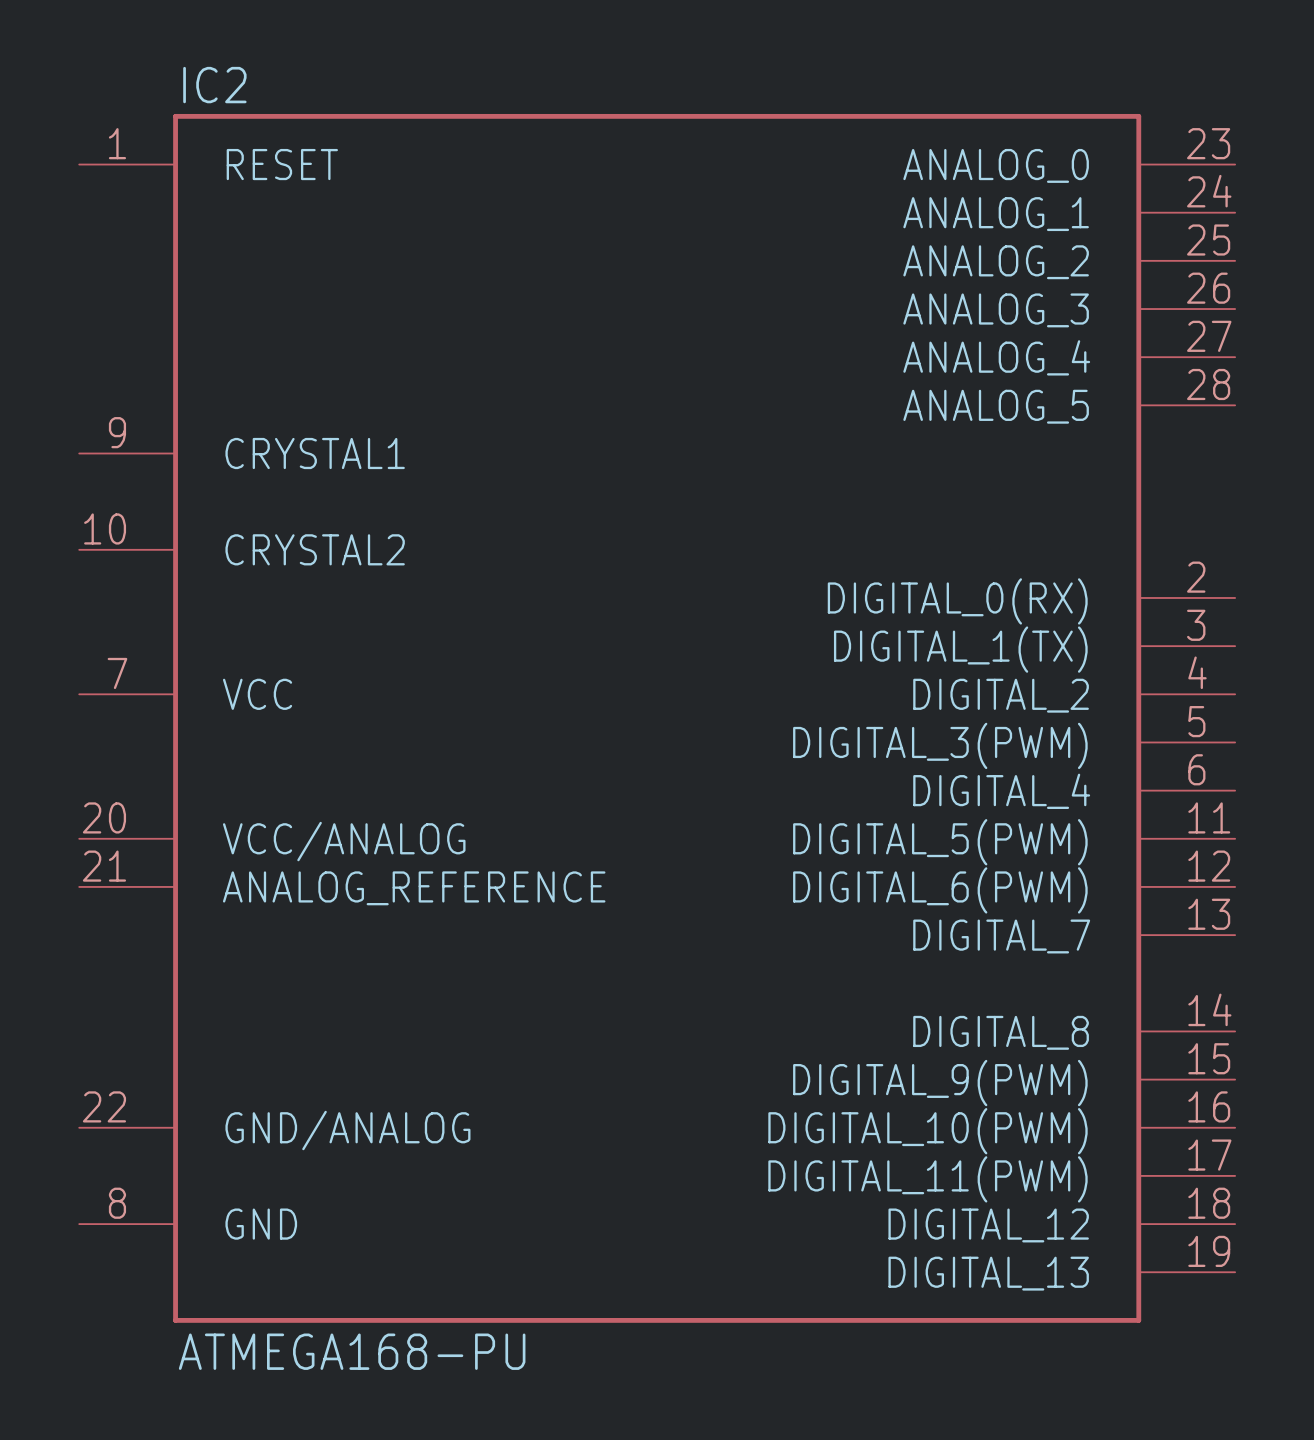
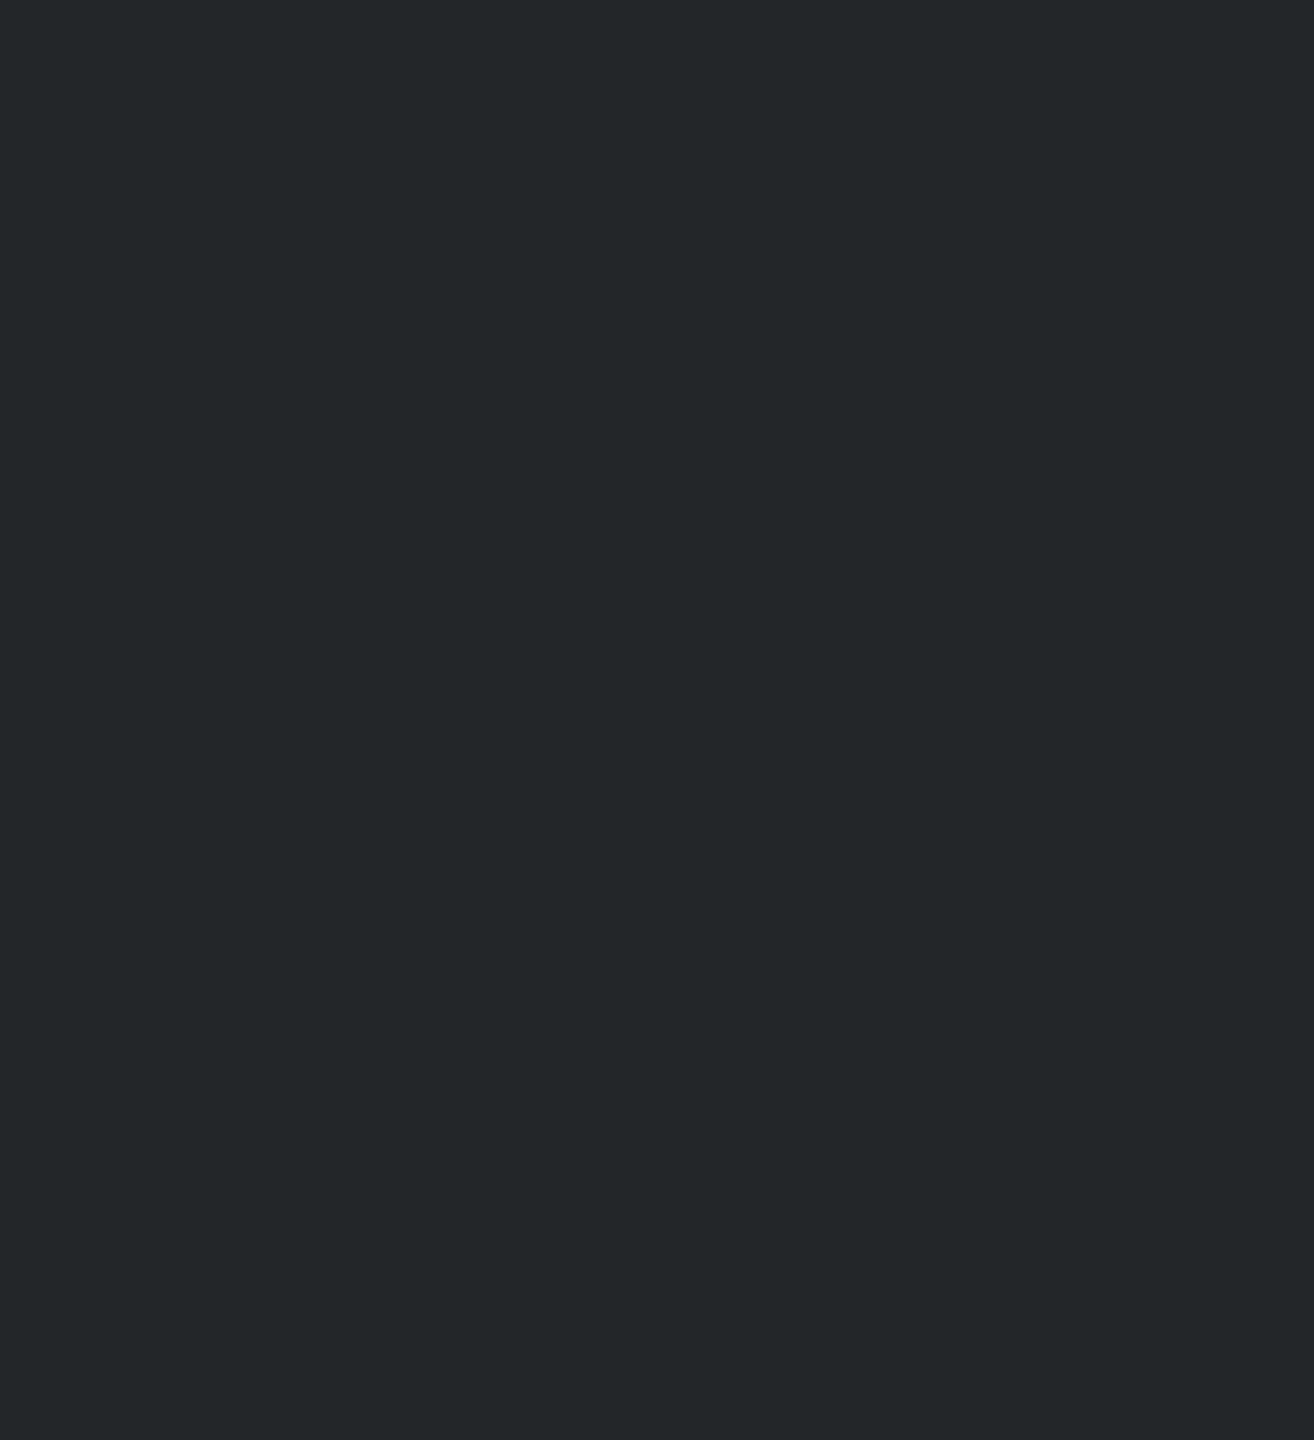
IC2: ATMEGA168-PU (657, 718) -> none

